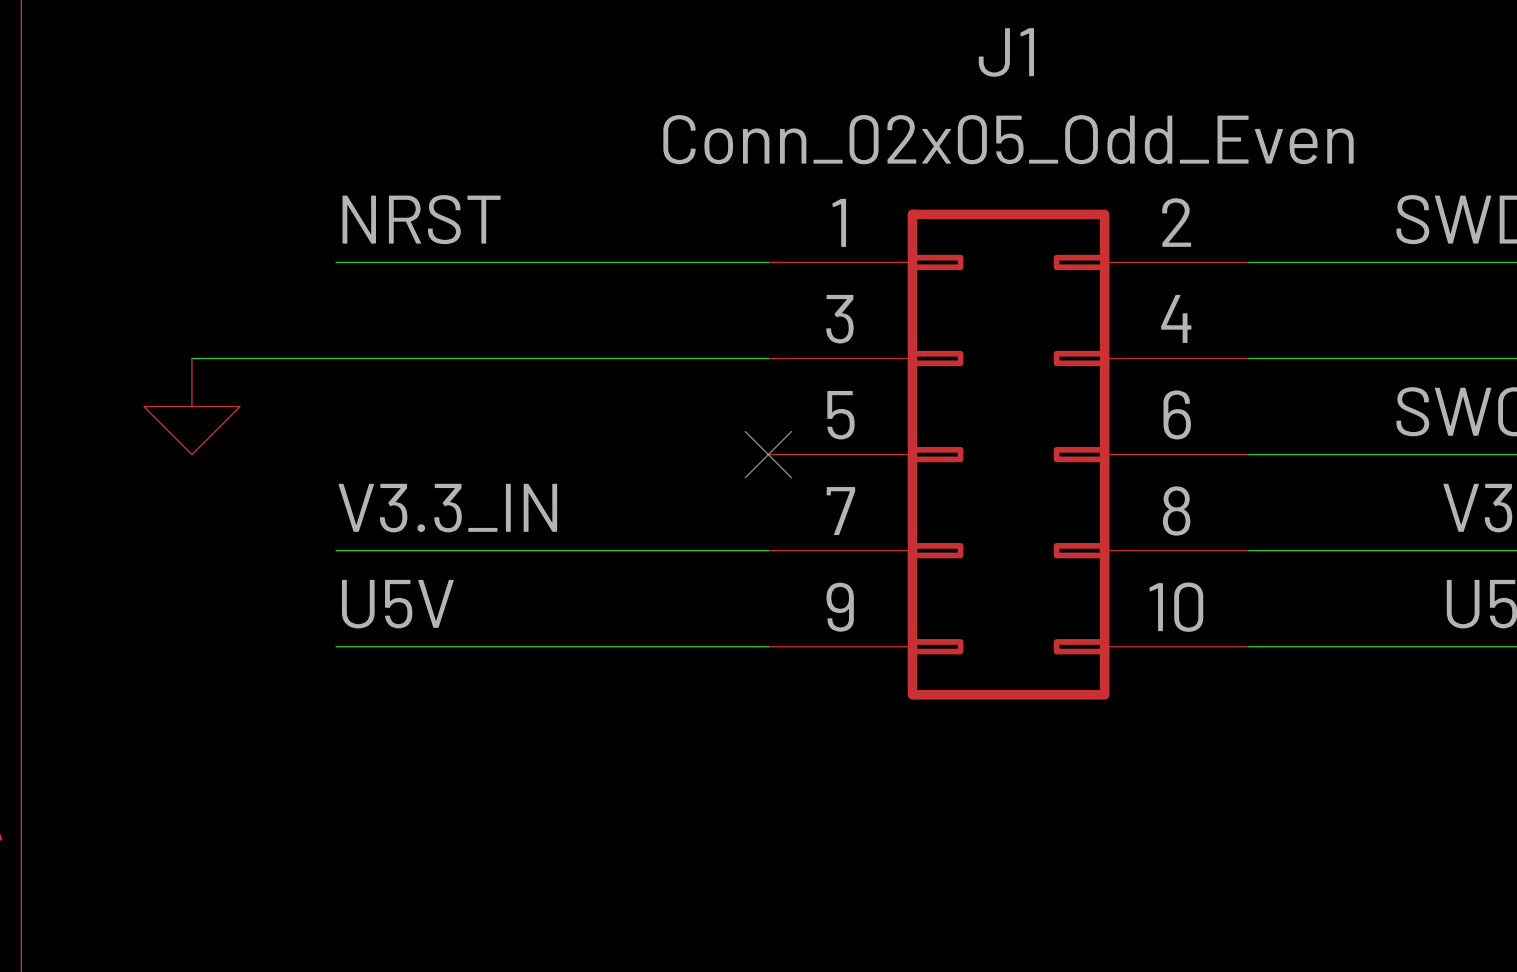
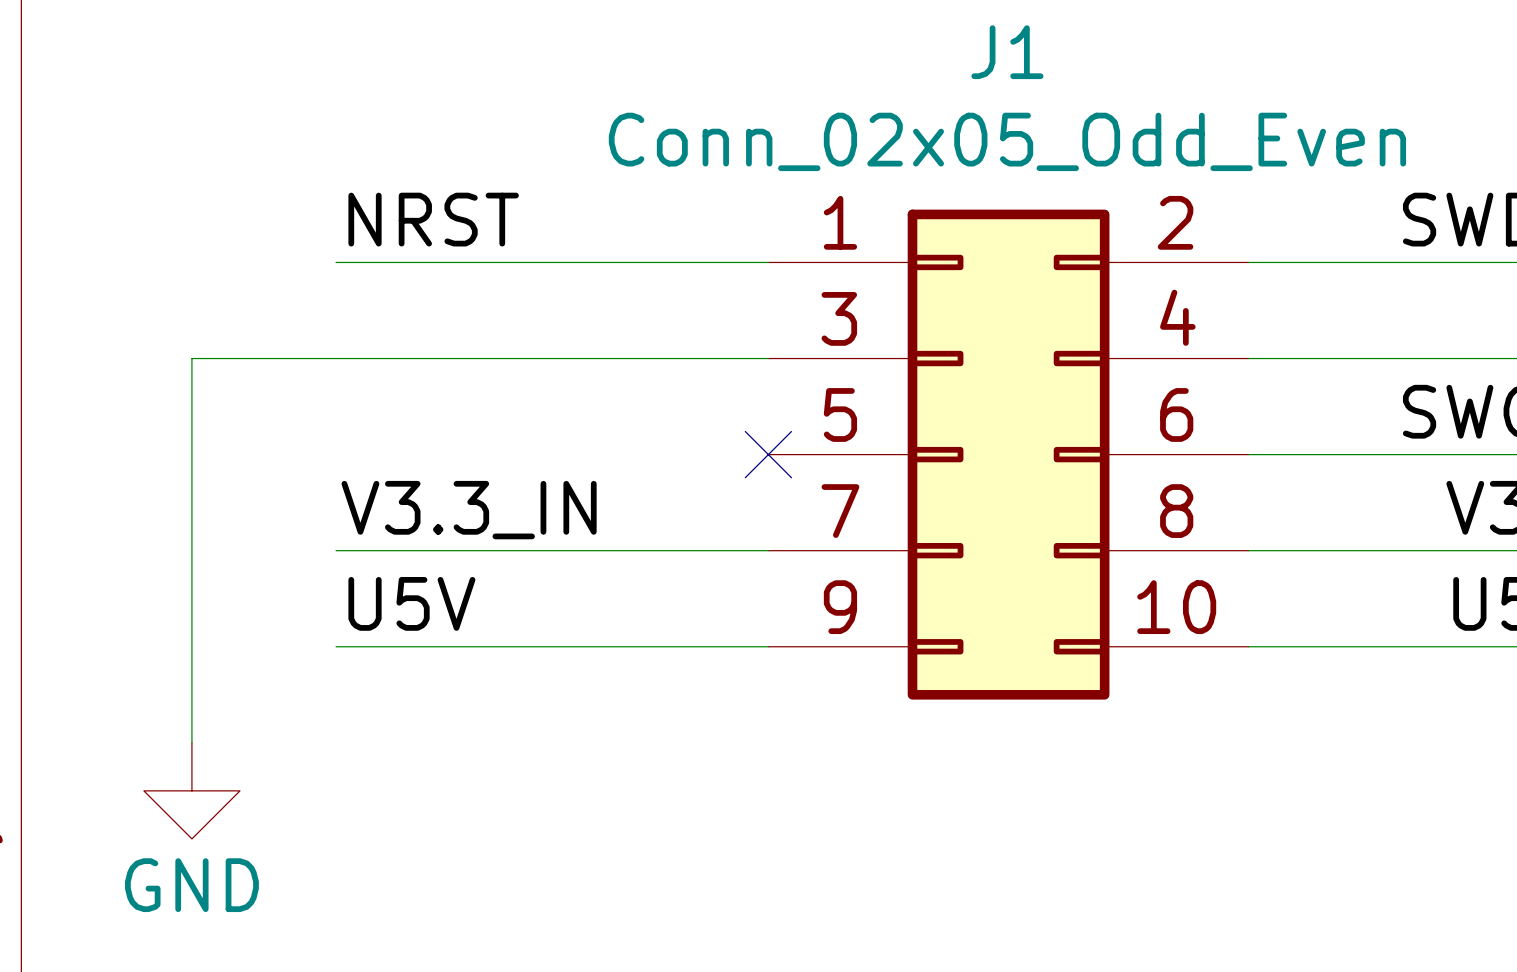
wire: none -> (191, 358) (191, 742)
power symbol: (191, 406) -> none
power symbol: none -> GND (191, 790)

